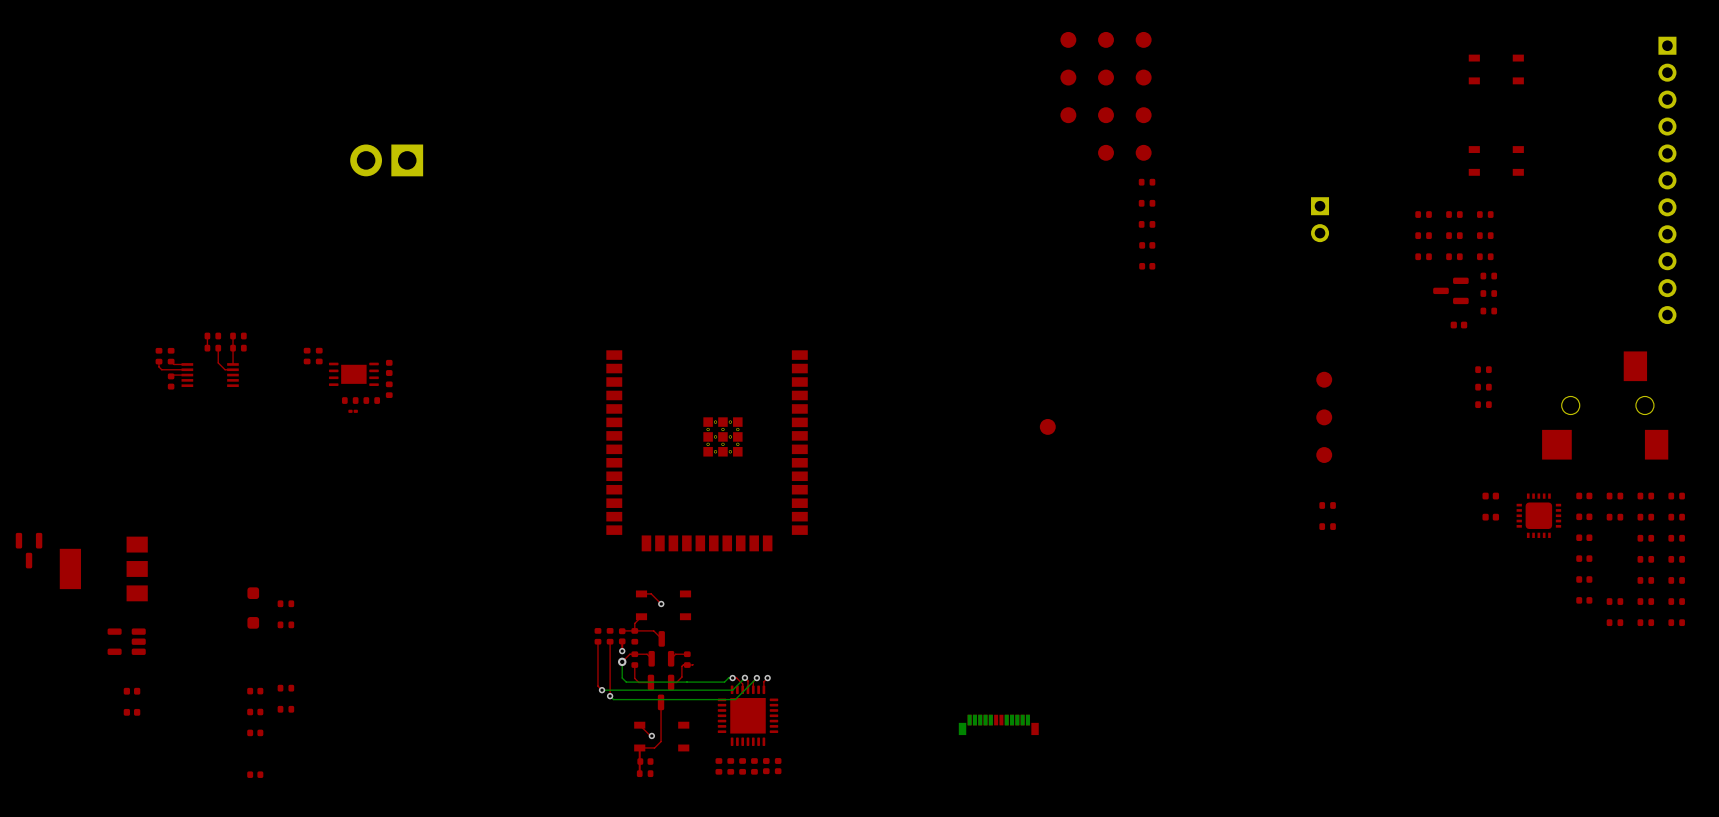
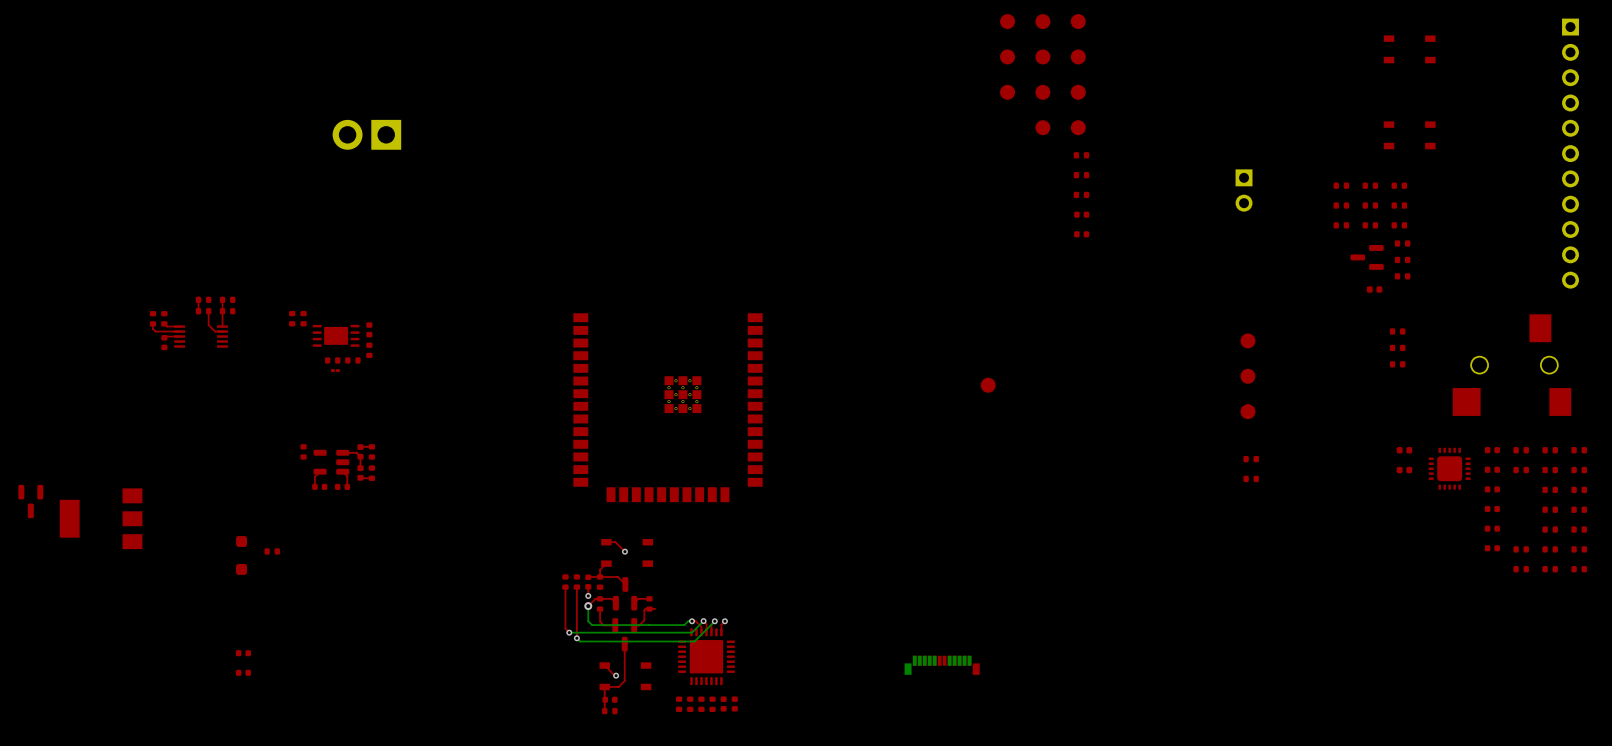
top track: none -> (371, 446) (360, 447)
part: none -> (303, 451)
part: none -> (360, 451)
part: none -> (371, 451)
top track: none -> (342, 452) (356, 452) (360, 456) (360, 468)
top track: none -> (320, 471) (314, 476) (314, 486)
top track: none -> (342, 471) (347, 476) (347, 486)
part: none -> (360, 472)
part: none -> (371, 473)
top track: none -> (360, 477) (371, 478)
part: none -> (319, 486)
part: none -> (342, 486)
part: (285, 624) -> none
part position: (126, 641) -> (331, 462)
part: (285, 688) -> none
part: (132, 691) -> none
part: (255, 691) -> none
part: (285, 709) -> none
part: (132, 712) -> none
part: (255, 774) -> none

